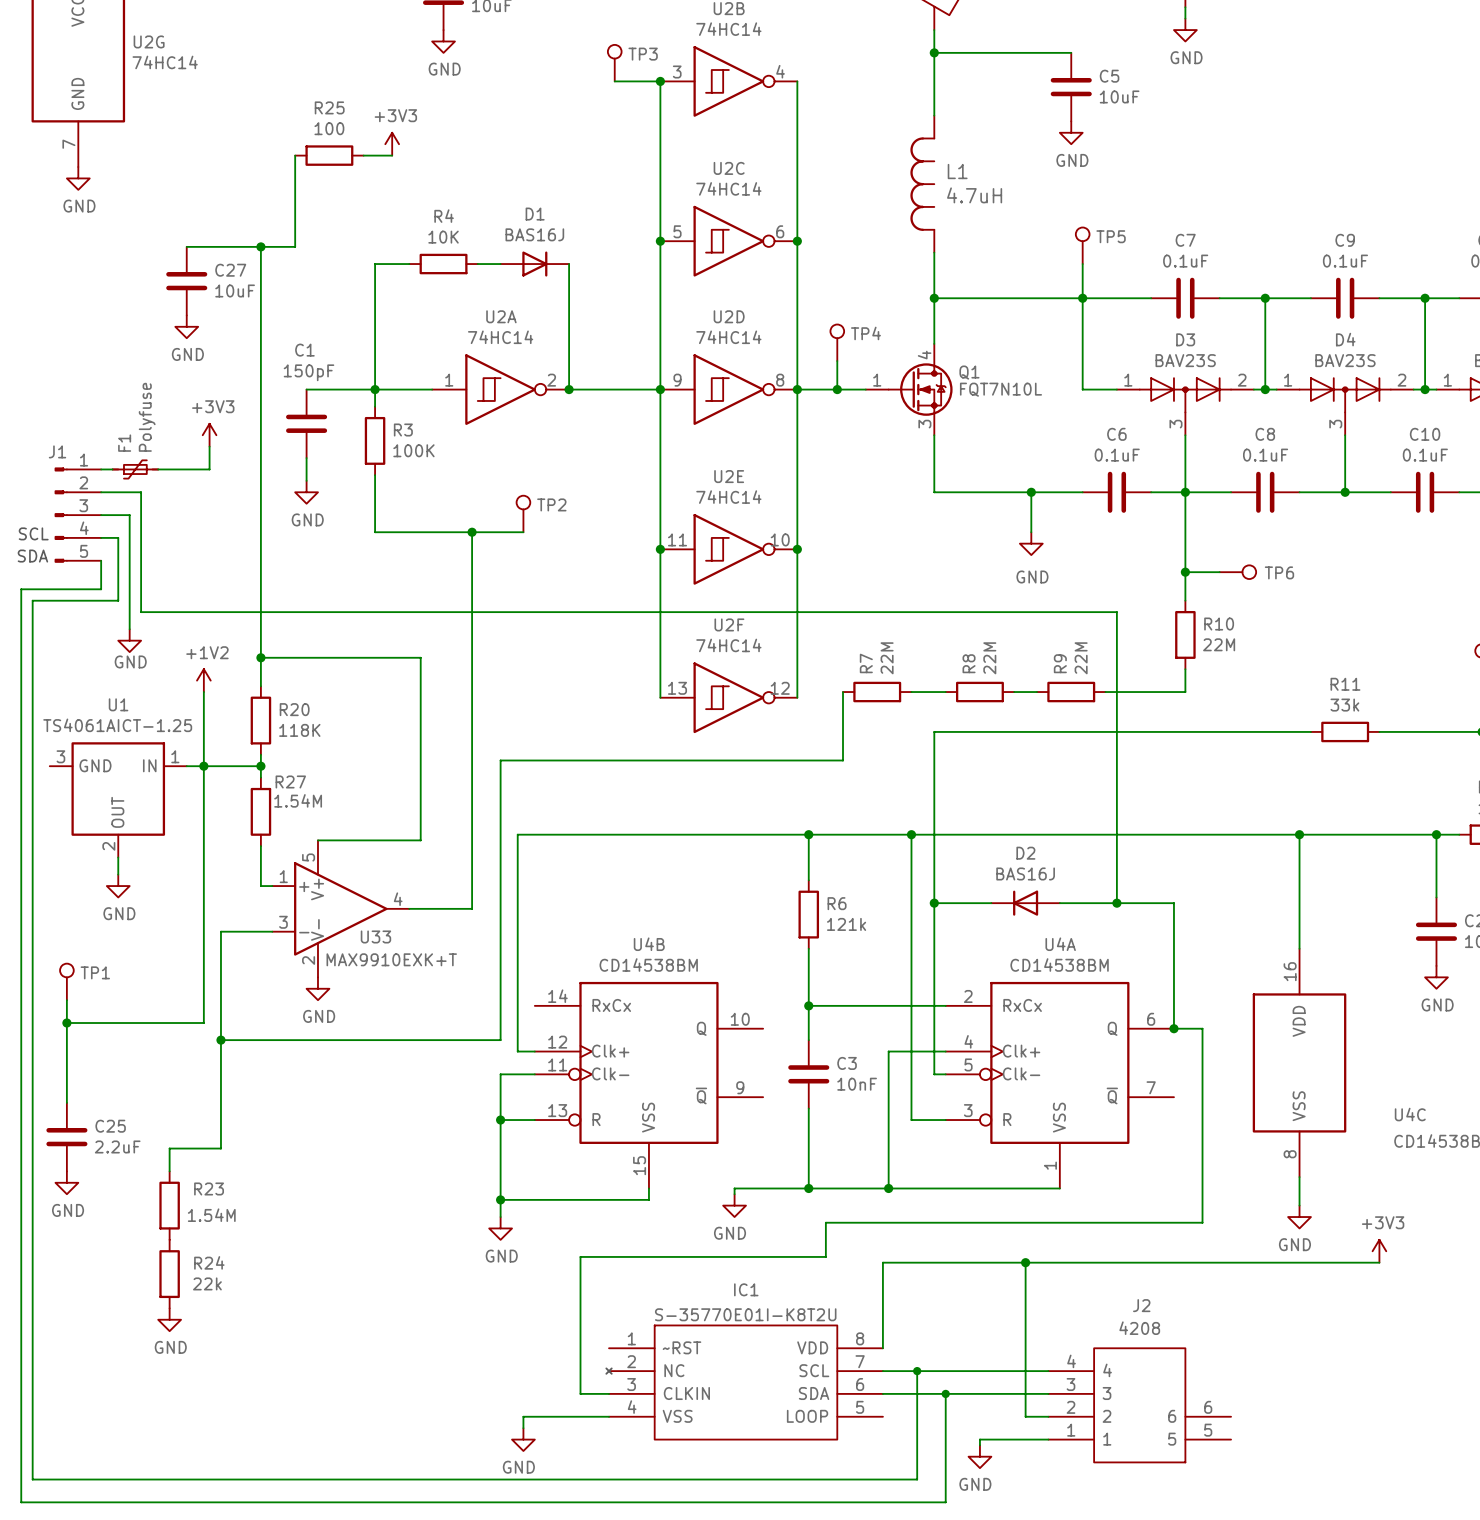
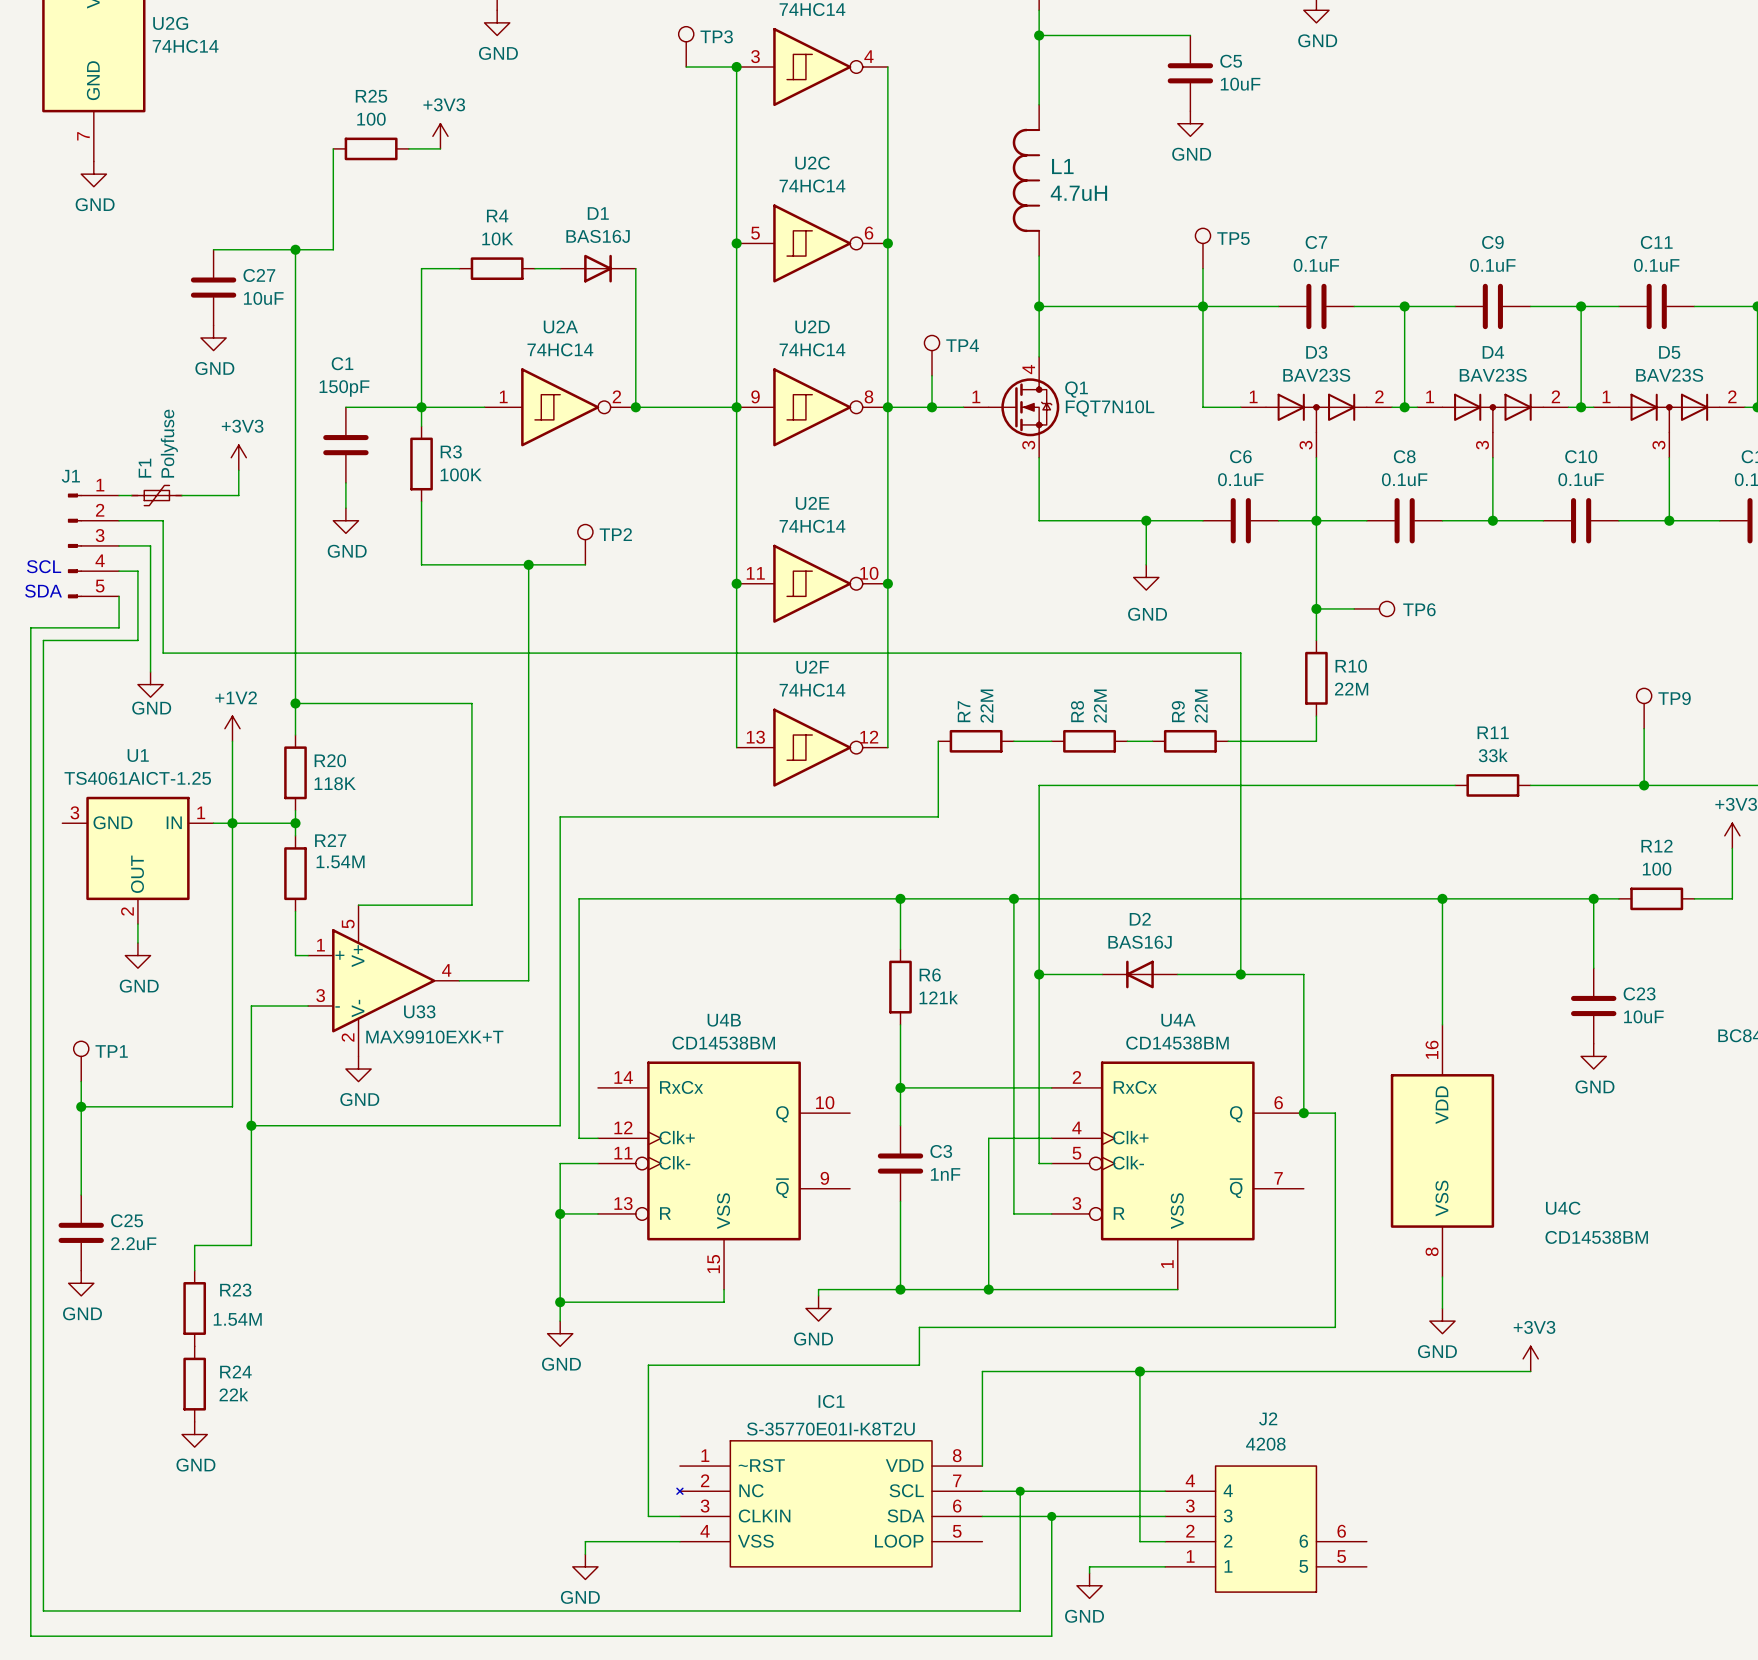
C3 value: 10nF (857, 1084) -> 1nF (945, 1174)

